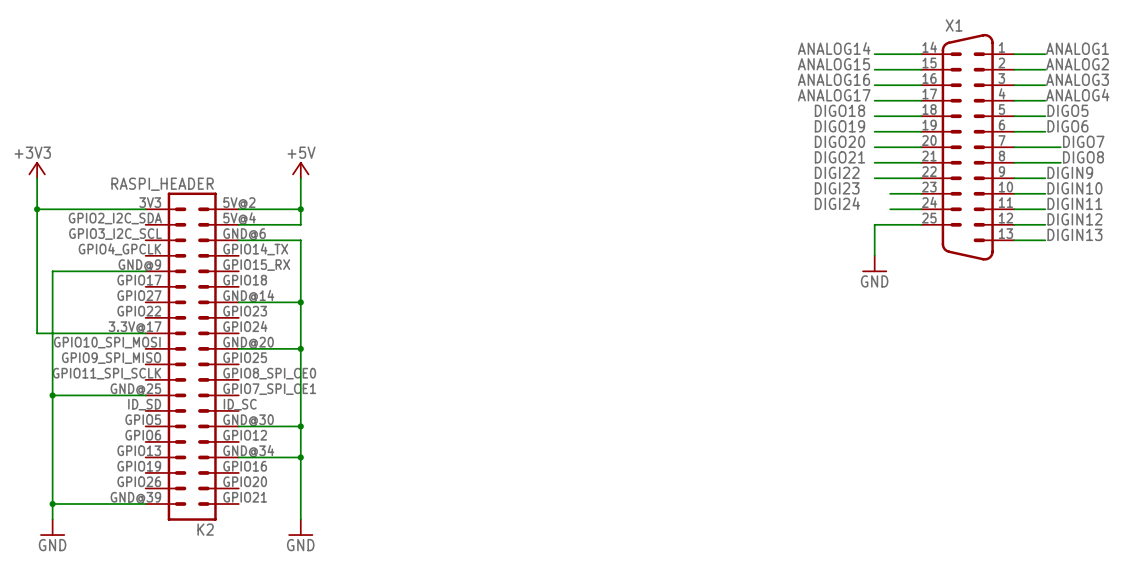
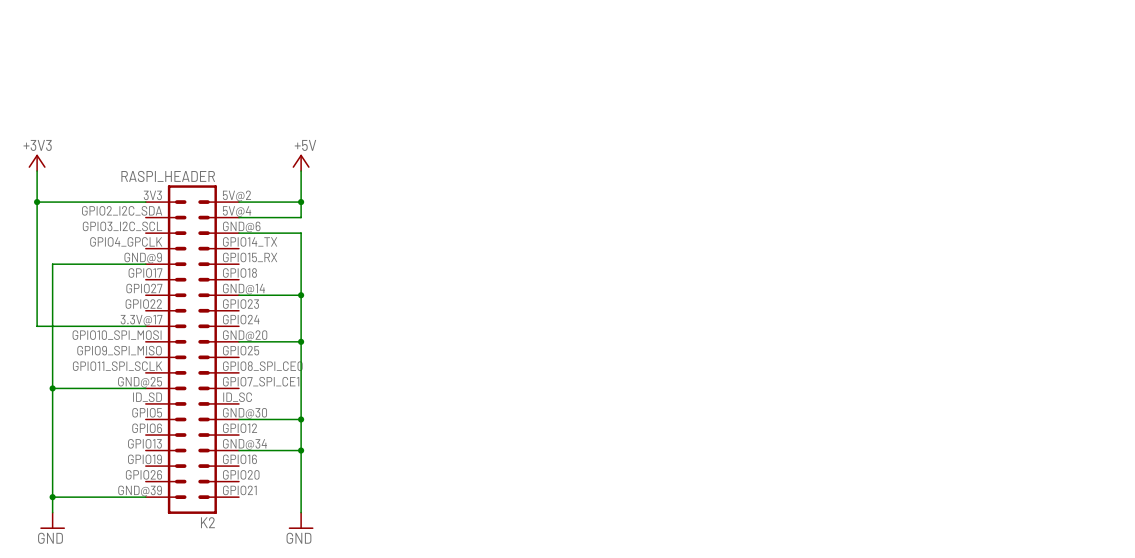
label: ANALOG14 (834, 48) -> none
label: ANALOG1 (1077, 48) -> none
wire: (874, 54) (921, 54) -> none
wire: (1014, 54) (1045, 54) -> none
label: ANALOG15 (833, 64) -> none
label: ANALOG2 (1077, 64) -> none
wire: (874, 69) (921, 69) -> none
wire: (1014, 69) (1045, 69) -> none
label: ANALOG16 (833, 79) -> none
label: ANALOG3 (1077, 79) -> none
wire: (874, 85) (921, 85) -> none
wire: (1014, 85) (1045, 85) -> none
label: ANALOG17 (834, 95) -> none
label: ANALOG4 (1077, 95) -> none
wire: (874, 100) (921, 100) -> none
wire: (1014, 100) (1045, 100) -> none
label: DIGO18 (839, 110) -> none
label: DIGO5 (1067, 110) -> none
wire: (874, 116) (921, 116) -> none
wire: (1014, 116) (1045, 116) -> none
label: DIGO19 (839, 126) -> none
label: DIGO6 (1067, 126) -> none
wire: (874, 131) (921, 131) -> none
wire: (1014, 131) (1045, 131) -> none
label: DIGO20 (839, 141) -> none
label: DIGO7 (1083, 141) -> none
wire: (874, 147) (921, 147) -> none
X1: (967, 147) -> none
wire: (1014, 147) (1060, 147) -> none
label: DIGO21 (839, 157) -> none
label: DIGO8 (1083, 157) -> none
wire: (874, 162) (921, 162) -> none
wire: (1014, 162) (1060, 162) -> none
label: DIGI22 (837, 172) -> none
label: DIGIN9 (1070, 172) -> none
wire: (874, 178) (921, 178) -> none
wire: (1014, 178) (1045, 178) -> none
label: DIGI23 (837, 188) -> none
label: DIGIN10 (1074, 188) -> none
wire: (890, 193) (921, 193) -> none
wire: (1014, 193) (1045, 193) -> none
label: DIGI24 (837, 203) -> none
label: DIGIN11 (1074, 203) -> none
wire: (890, 209) (921, 209) -> none
wire: (1014, 209) (1045, 209) -> none
label: DIGIN12 (1074, 219) -> none
wire: (921, 224) (874, 224) (874, 255) -> none
wire: (1014, 224) (1045, 224) -> none
label: DIGIN13 (1074, 234) -> none
wire: (1014, 240) (1045, 240) -> none
power symbol: GND (874, 263) -> none

